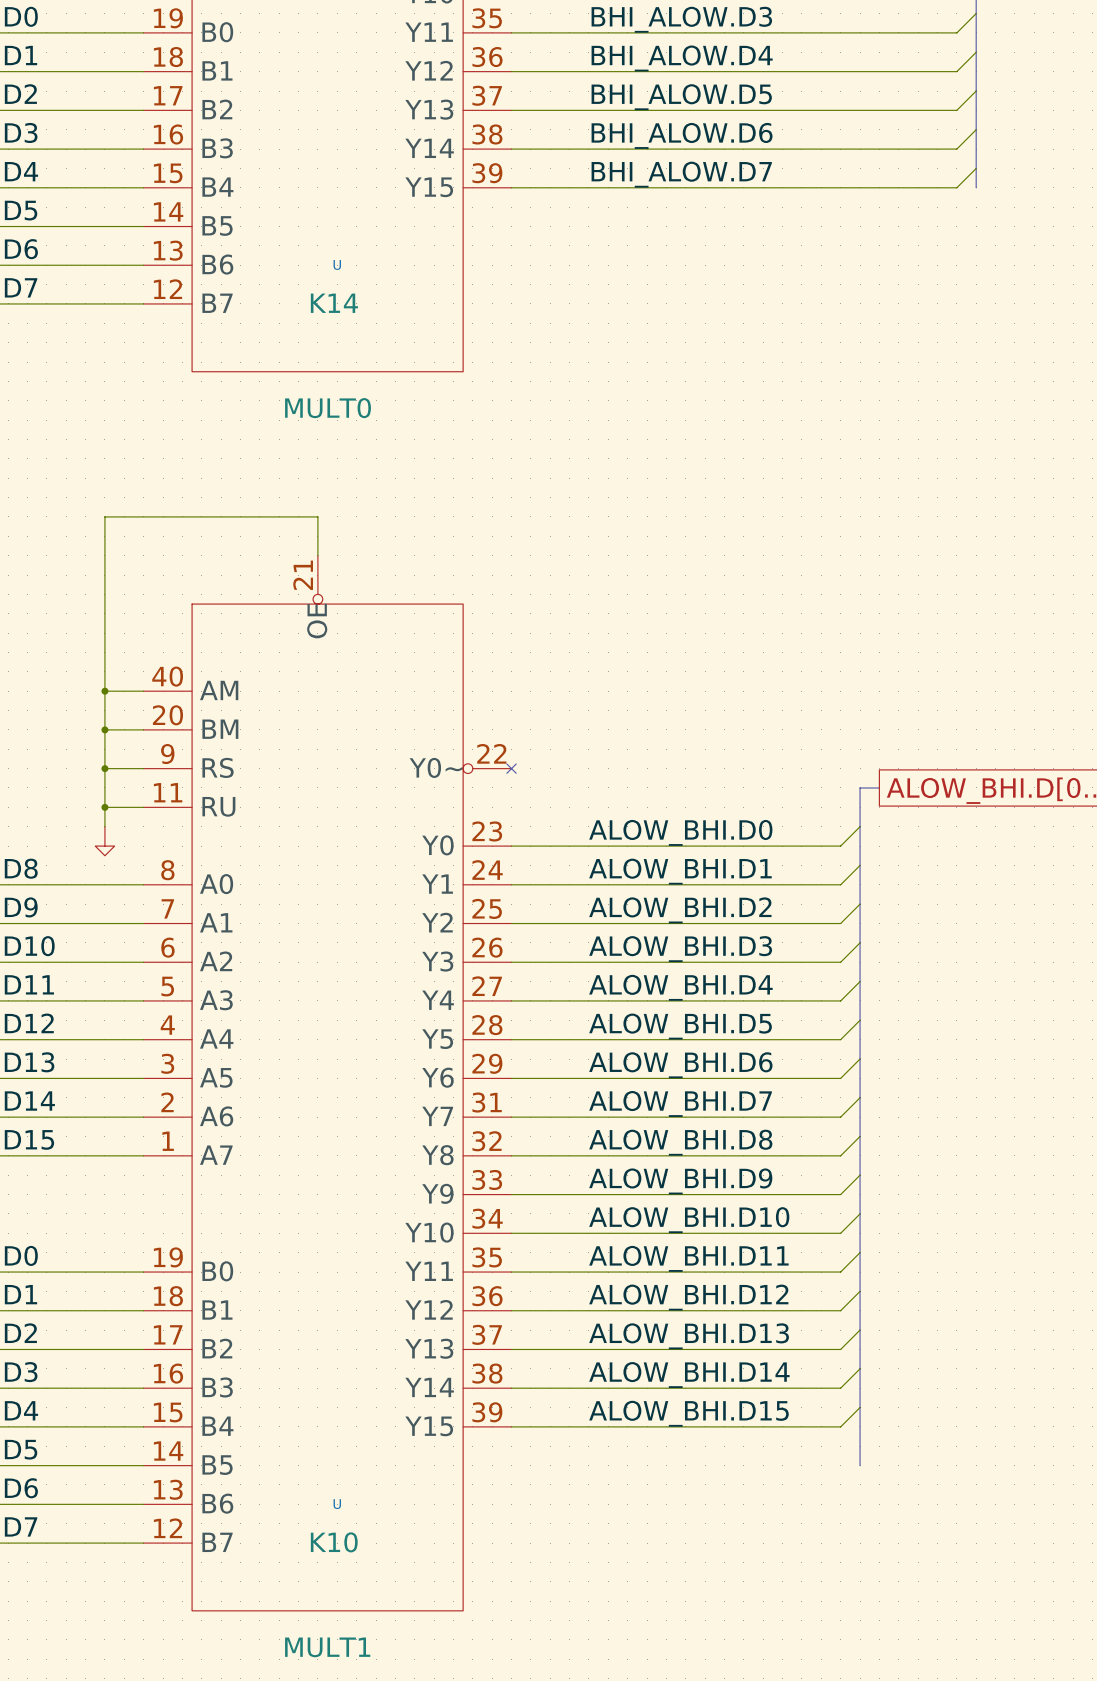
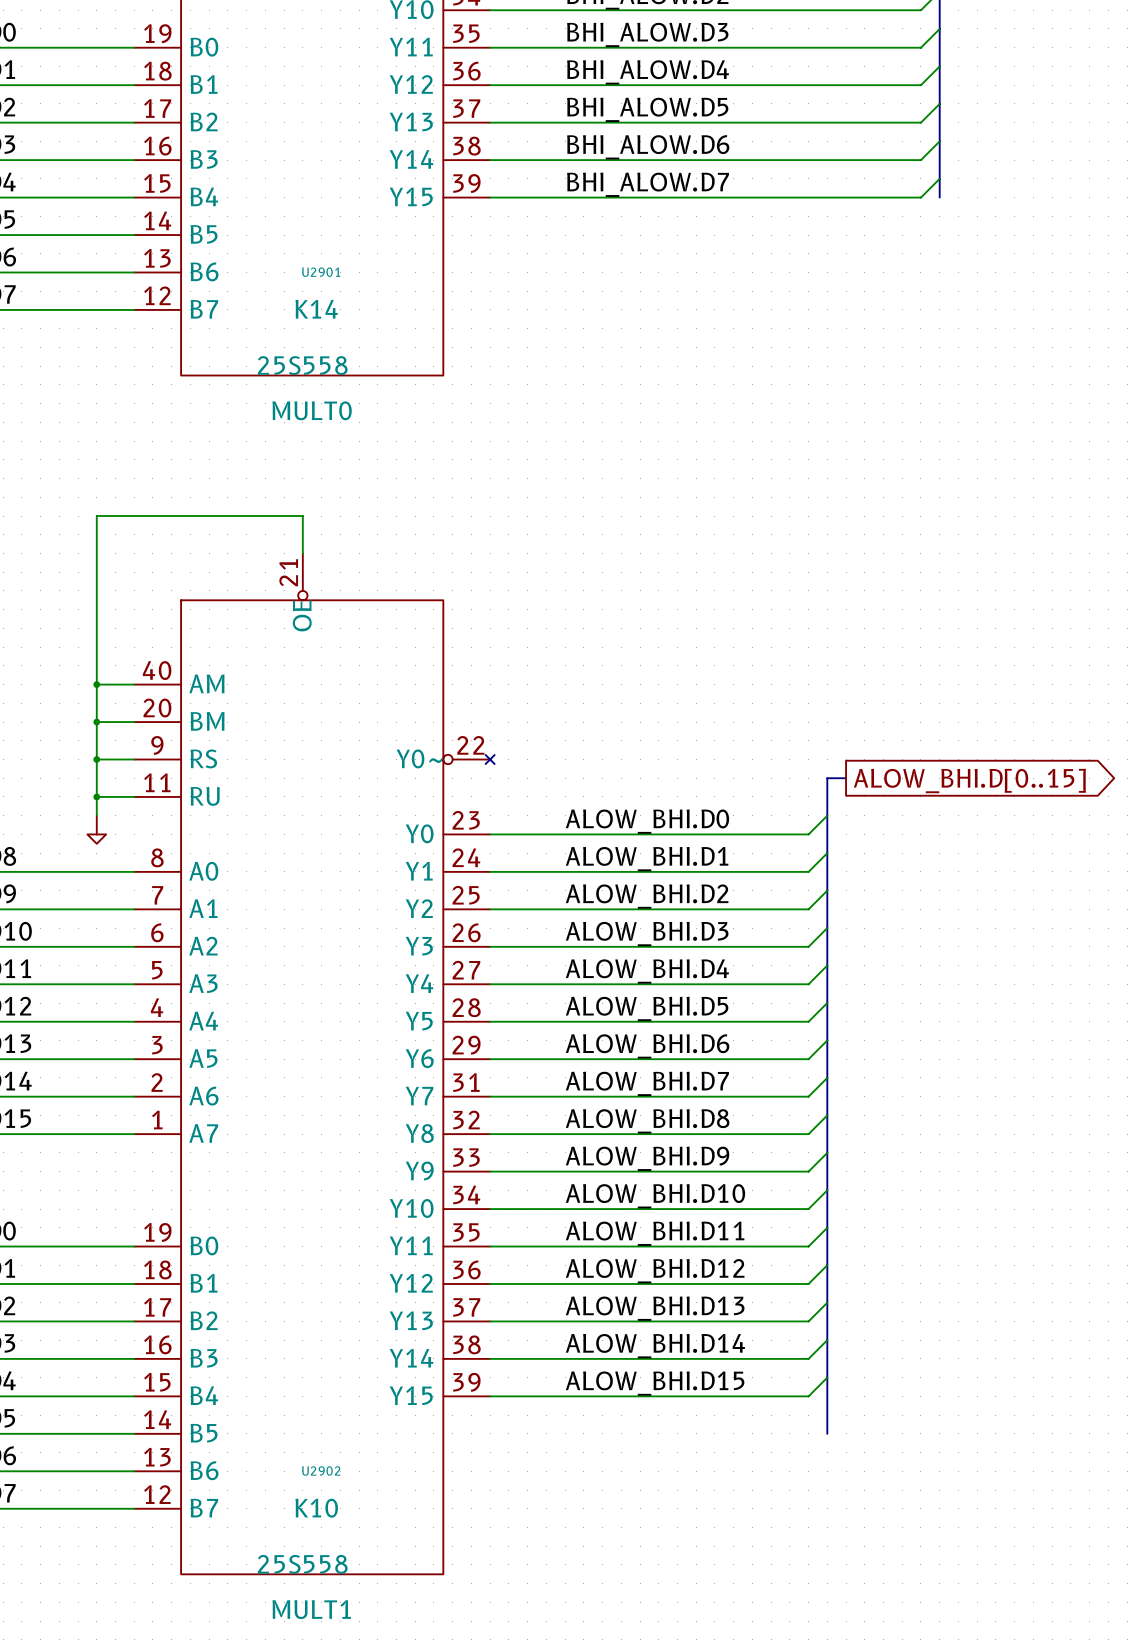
U name: U (337, 264) -> U2901 (321, 272)
U value: none -> 25S558 (302, 365)
U name: U (337, 1504) -> U2902 (321, 1471)
U value: none -> 25S558 (302, 1564)

